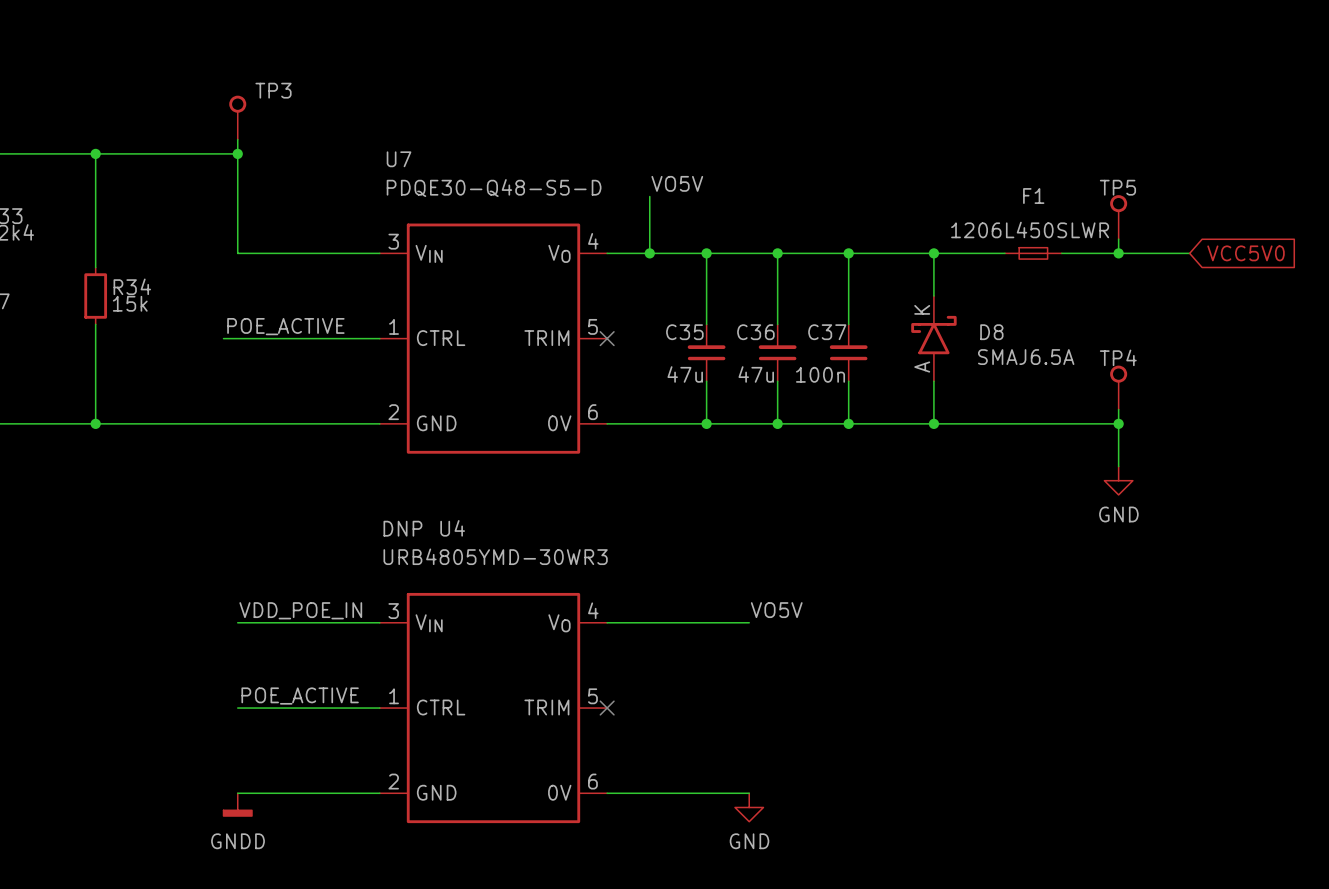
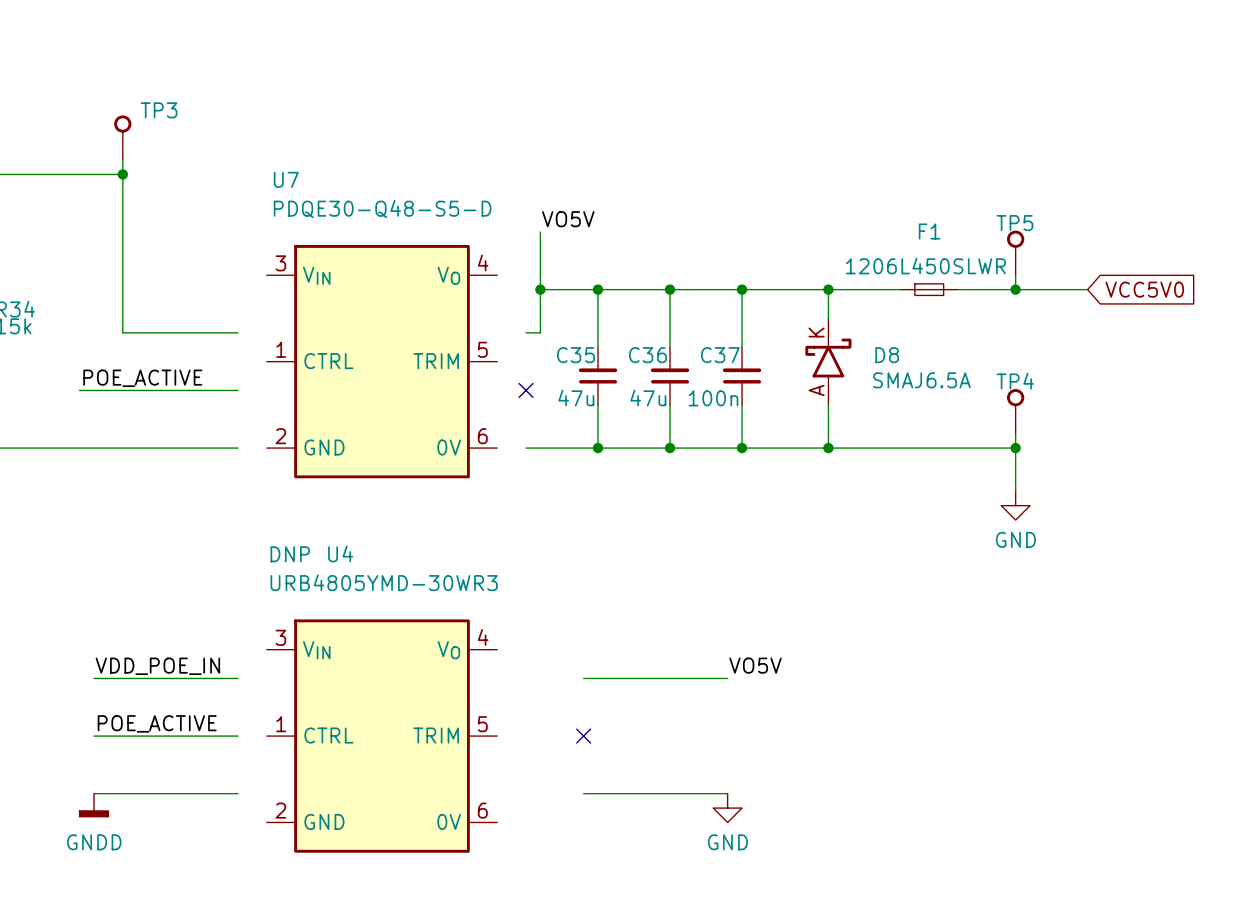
label position: VO5V (677, 183) -> VO5V (568, 219)
wire: (649, 196) (649, 210) -> none
TP5 position: (1118, 217) -> (1015, 252)
wire: (237, 253) (379, 253) -> (122, 275) (122, 332) (238, 332)
wire: (607, 253) (1004, 253) -> none
wire: none -> (540, 275) (540, 332) (526, 332)
junction position: (649, 253) -> (540, 289)
wire: (706, 253) (706, 267) -> none
junction position: (706, 253) -> (598, 289)
wire: (777, 253) (777, 267) -> none
junction position: (777, 253) -> (670, 289)
wire: (848, 253) (848, 267) -> none
junction position: (848, 253) -> (742, 289)
wire: (933, 253) (933, 267) -> none
junction position: (933, 253) -> (828, 289)
F1 position: (1033, 253) -> (929, 289)
wire: (1061, 253) (1189, 253) -> (958, 289) (1087, 289)
junction position: (1118, 253) -> (1015, 289)
global label position: VCC5V0 (1246, 253) -> VCC5V0 (1144, 289)
wire: none -> (540, 289) (900, 289)
label position: POE_ACTIVE (285, 326) -> POE_ACTIVE (142, 378)
wire: (223, 338) (379, 338) -> (79, 390) (238, 390)
no-connect mark position: (607, 338) -> (526, 390)
wire: (351, 423) (379, 423) -> none
wire: (607, 423) (635, 423) -> none
label position: VDD_POE_IN (300, 610) -> VDD_POE_IN (157, 666)
label position: VO5V (776, 610) -> VO5V (755, 665)
wire: (237, 622) (379, 622) -> (93, 678) (238, 678)
wire: (607, 622) (749, 622) -> (583, 678) (727, 678)
label position: POE_ACTIVE (300, 696) -> POE_ACTIVE (157, 723)
wire: (351, 708) (379, 708) -> (93, 736) (122, 736)
no-connect mark: (607, 708) -> none
no-connect mark: none -> (583, 736)
wire: (237, 793) (379, 793) -> (93, 793) (238, 793)
wire: (607, 793) (749, 793) -> (583, 793) (727, 793)
power symbol position: GNDD (237, 804) -> GNDD (93, 805)
power symbol position: GND (749, 807) -> GND (727, 808)

